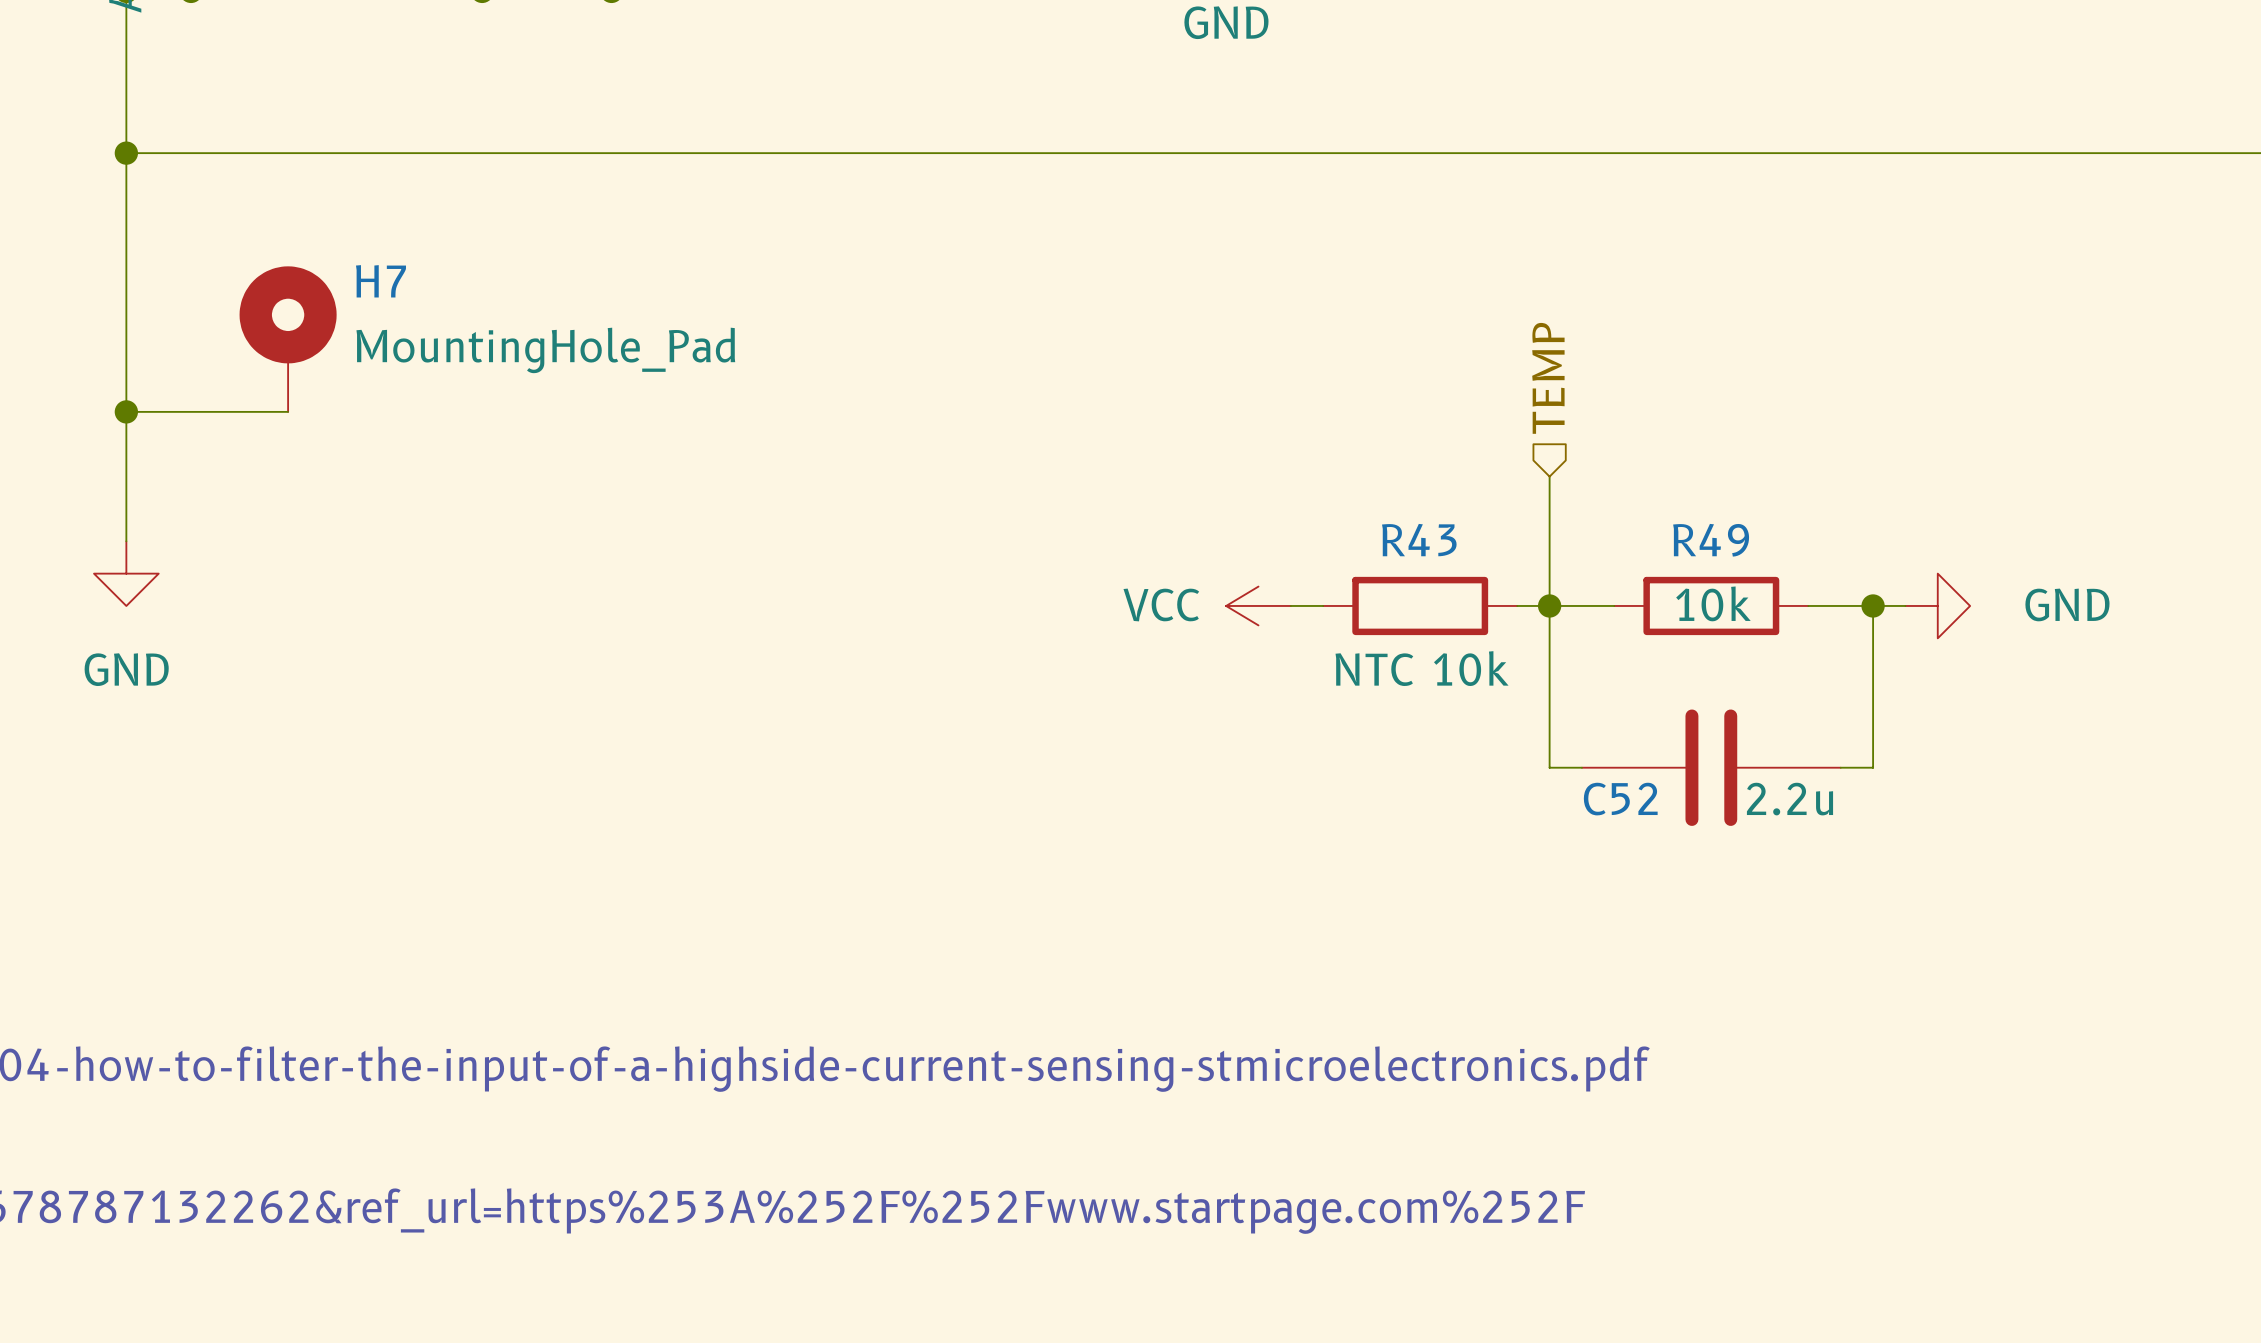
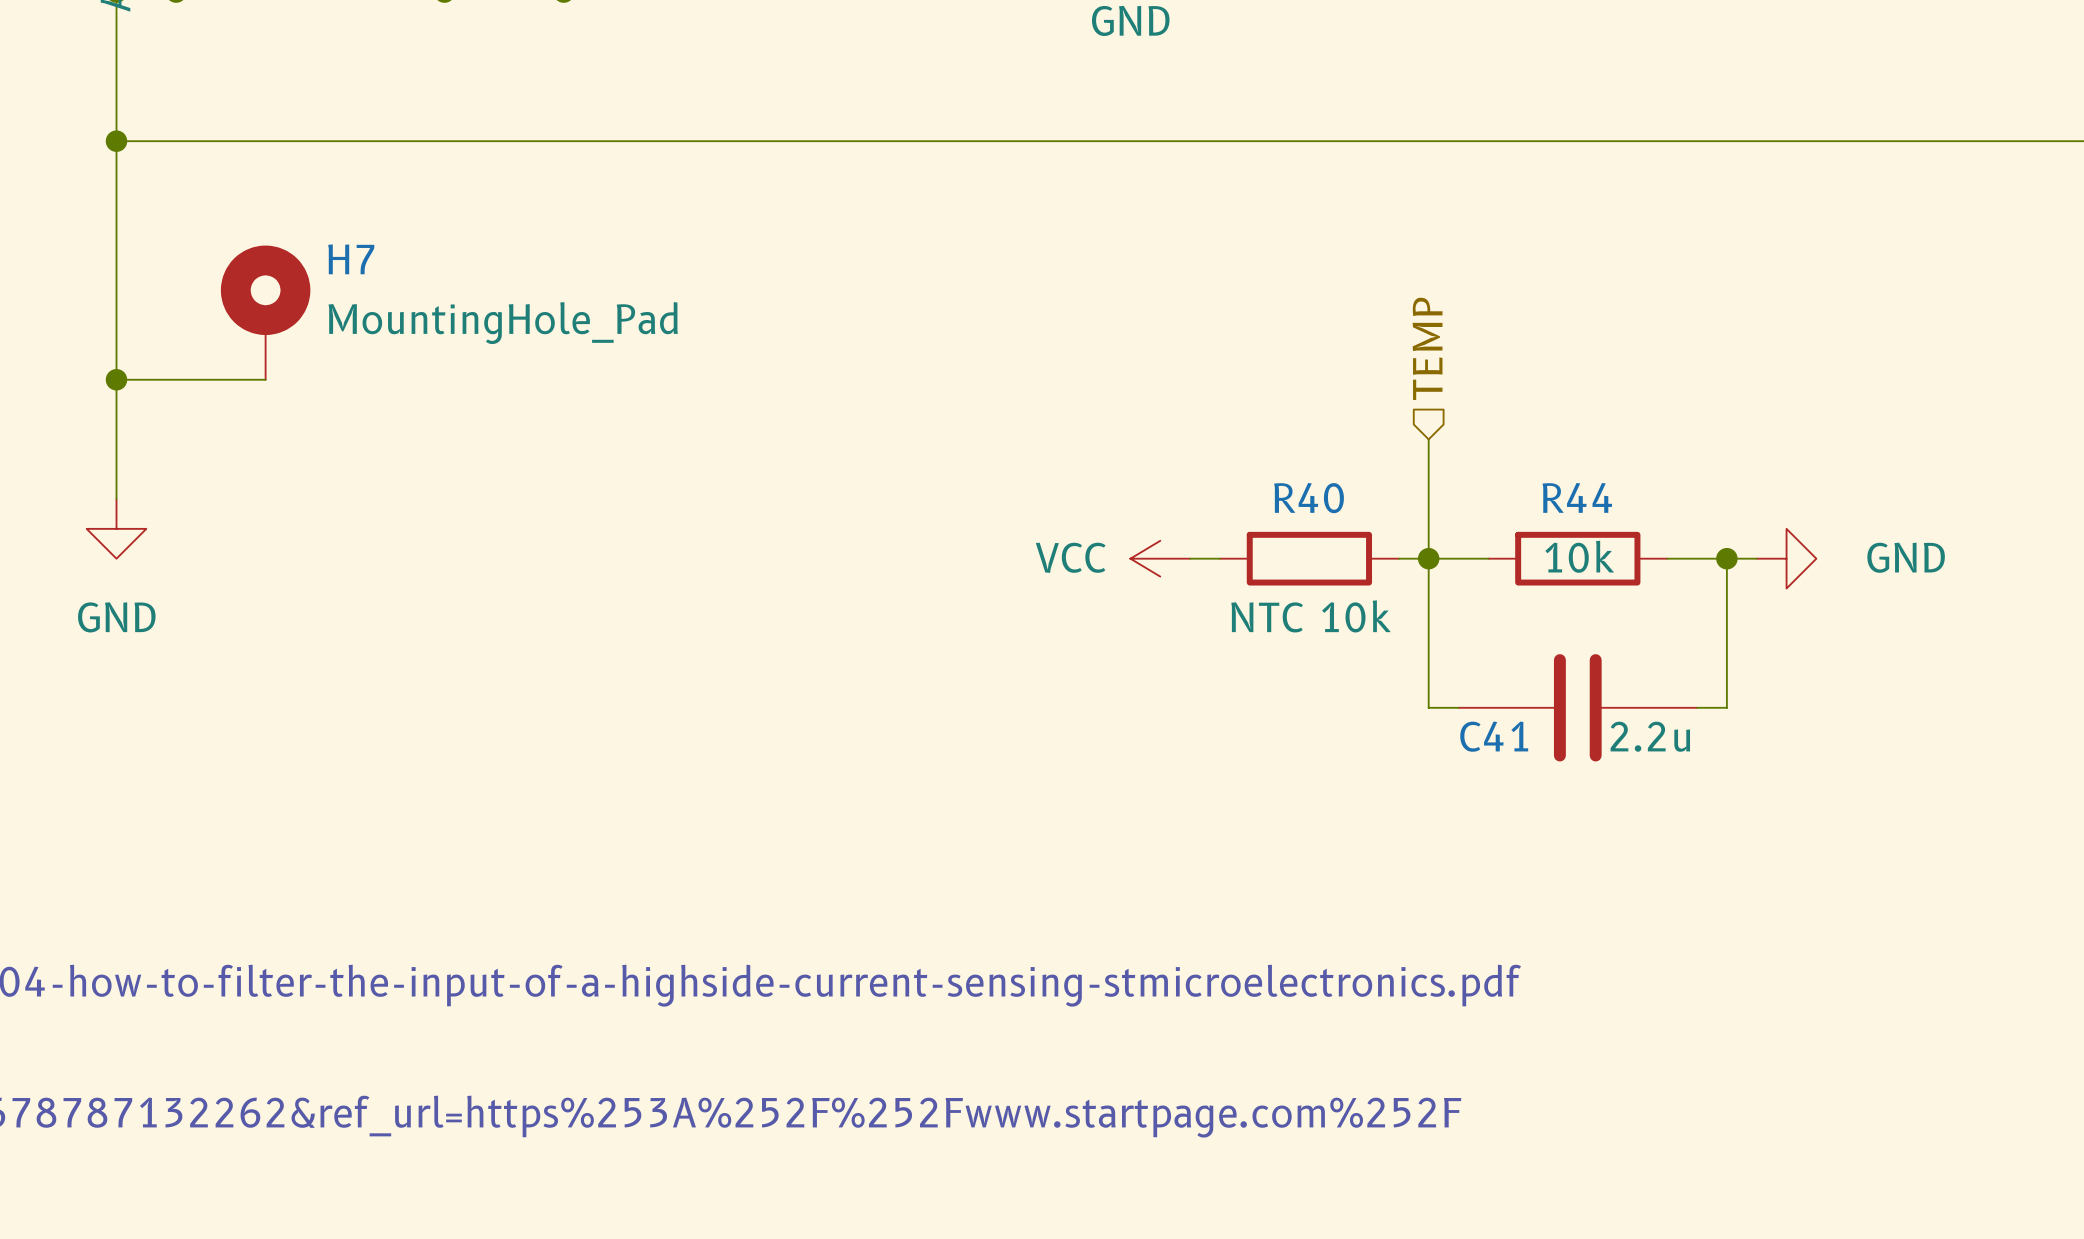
R43 name: R43 (1419, 540) -> R40 (1309, 498)
R49 name: R49 (1711, 540) -> R44 (1577, 497)
C52 name: C52 (1620, 799) -> C41 (1494, 736)

